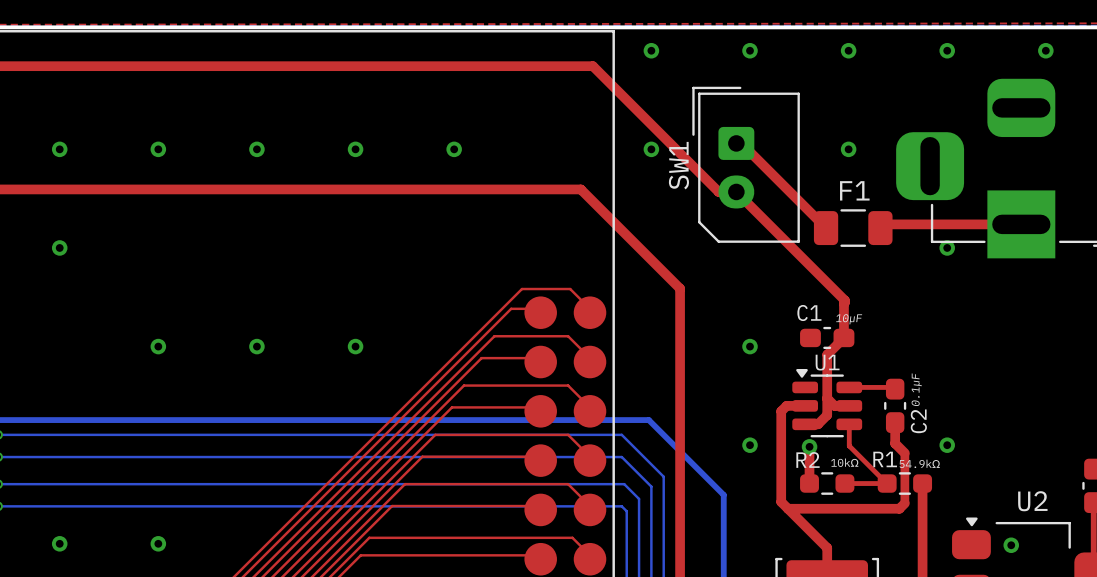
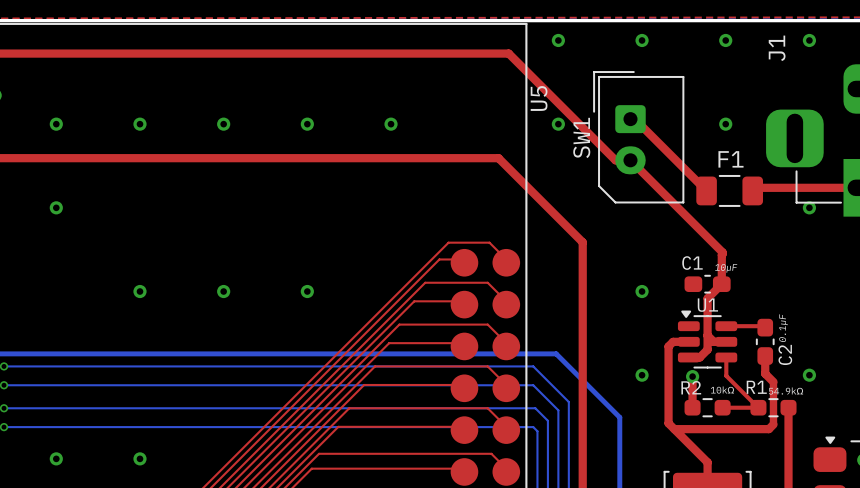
J1 name: none -> J1 (777, 48)
U5 name: none -> U5 (539, 98)

